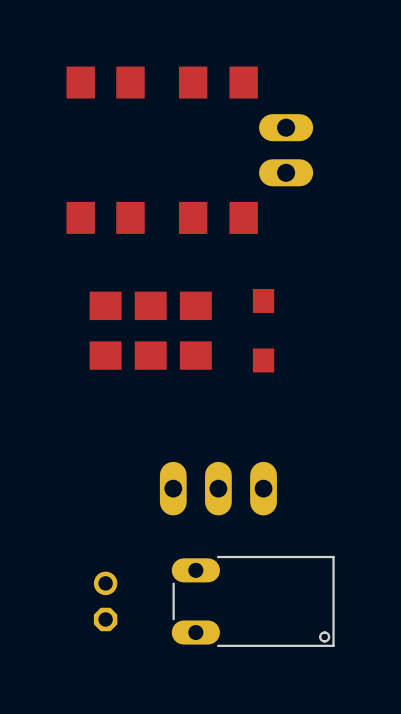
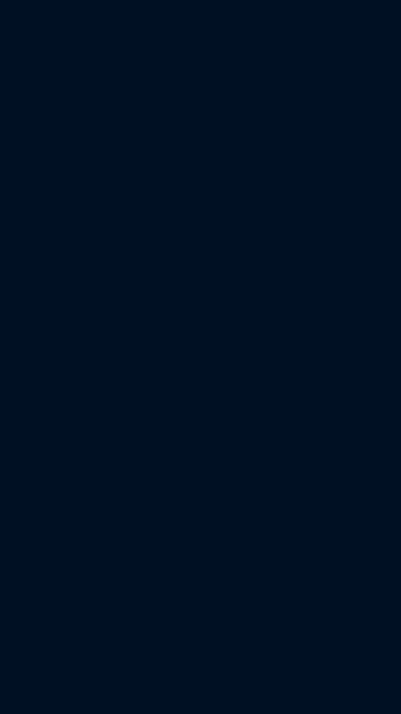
part: (105, 82) -> none
part: (218, 82) -> none
part: (286, 150) -> none
part: (105, 217) -> none
part: (218, 217) -> none
part: (105, 330) -> none
part: (150, 330) -> none
part: (195, 330) -> none
part: (263, 330) -> none
part: (218, 488) -> none
part: (105, 601) -> none
part: (253, 601) -> none

